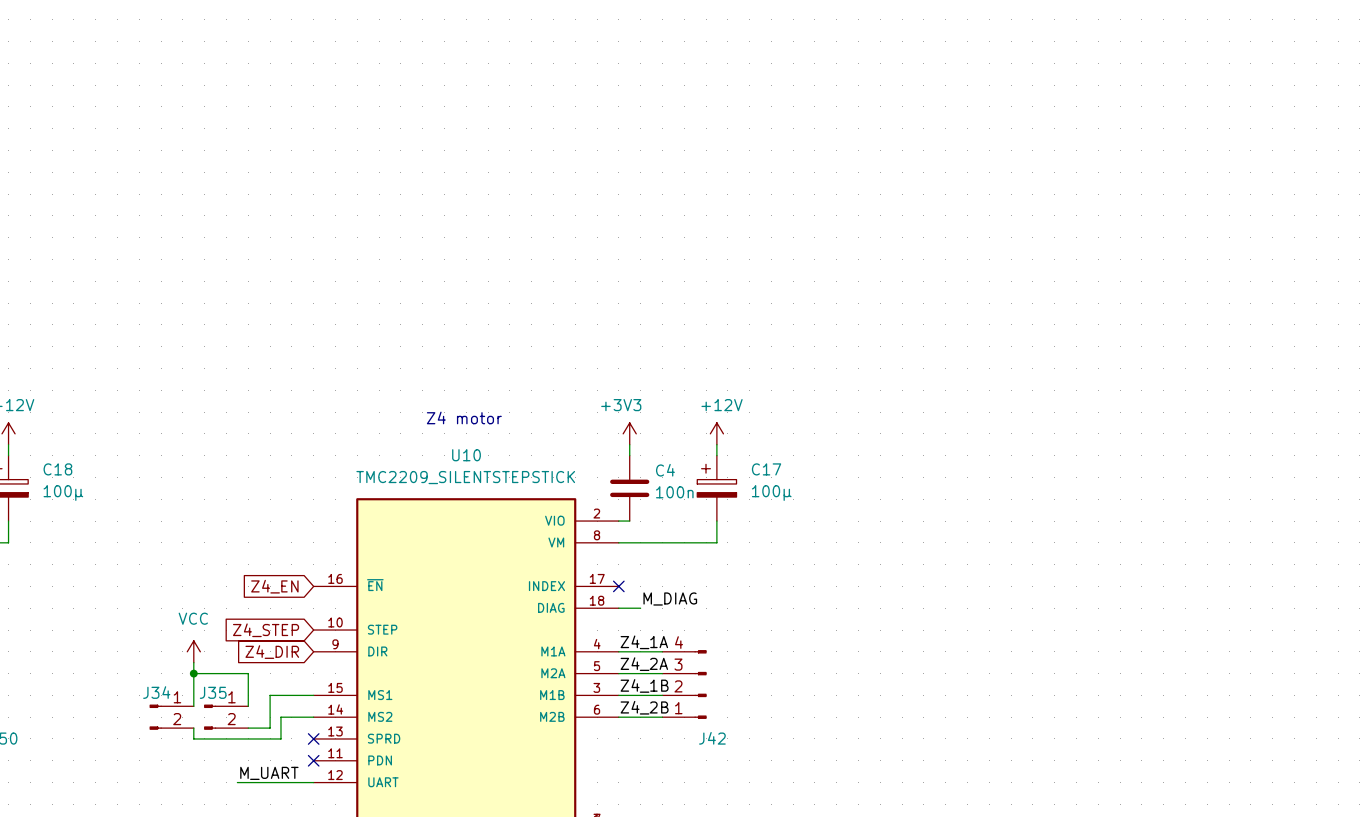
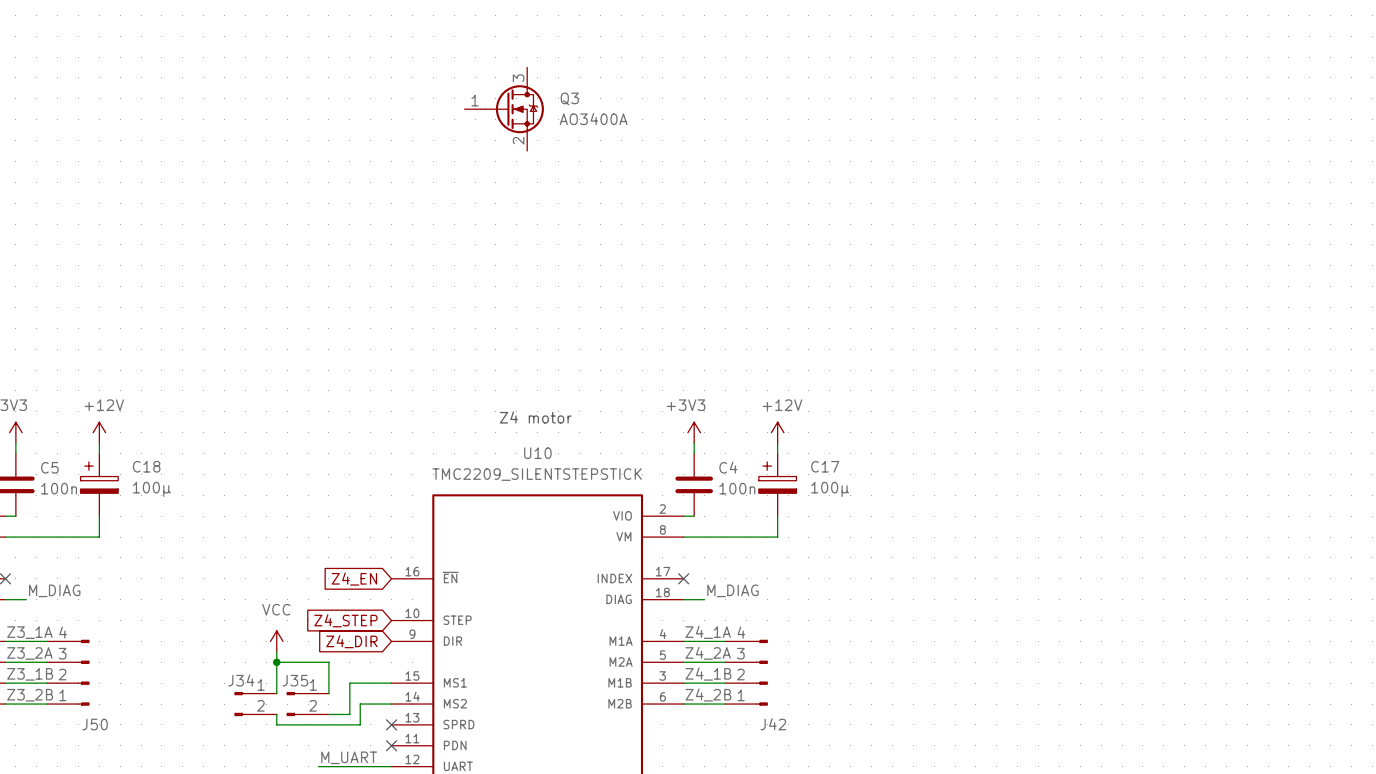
Q3: none -> AO3400A (504, 109)

